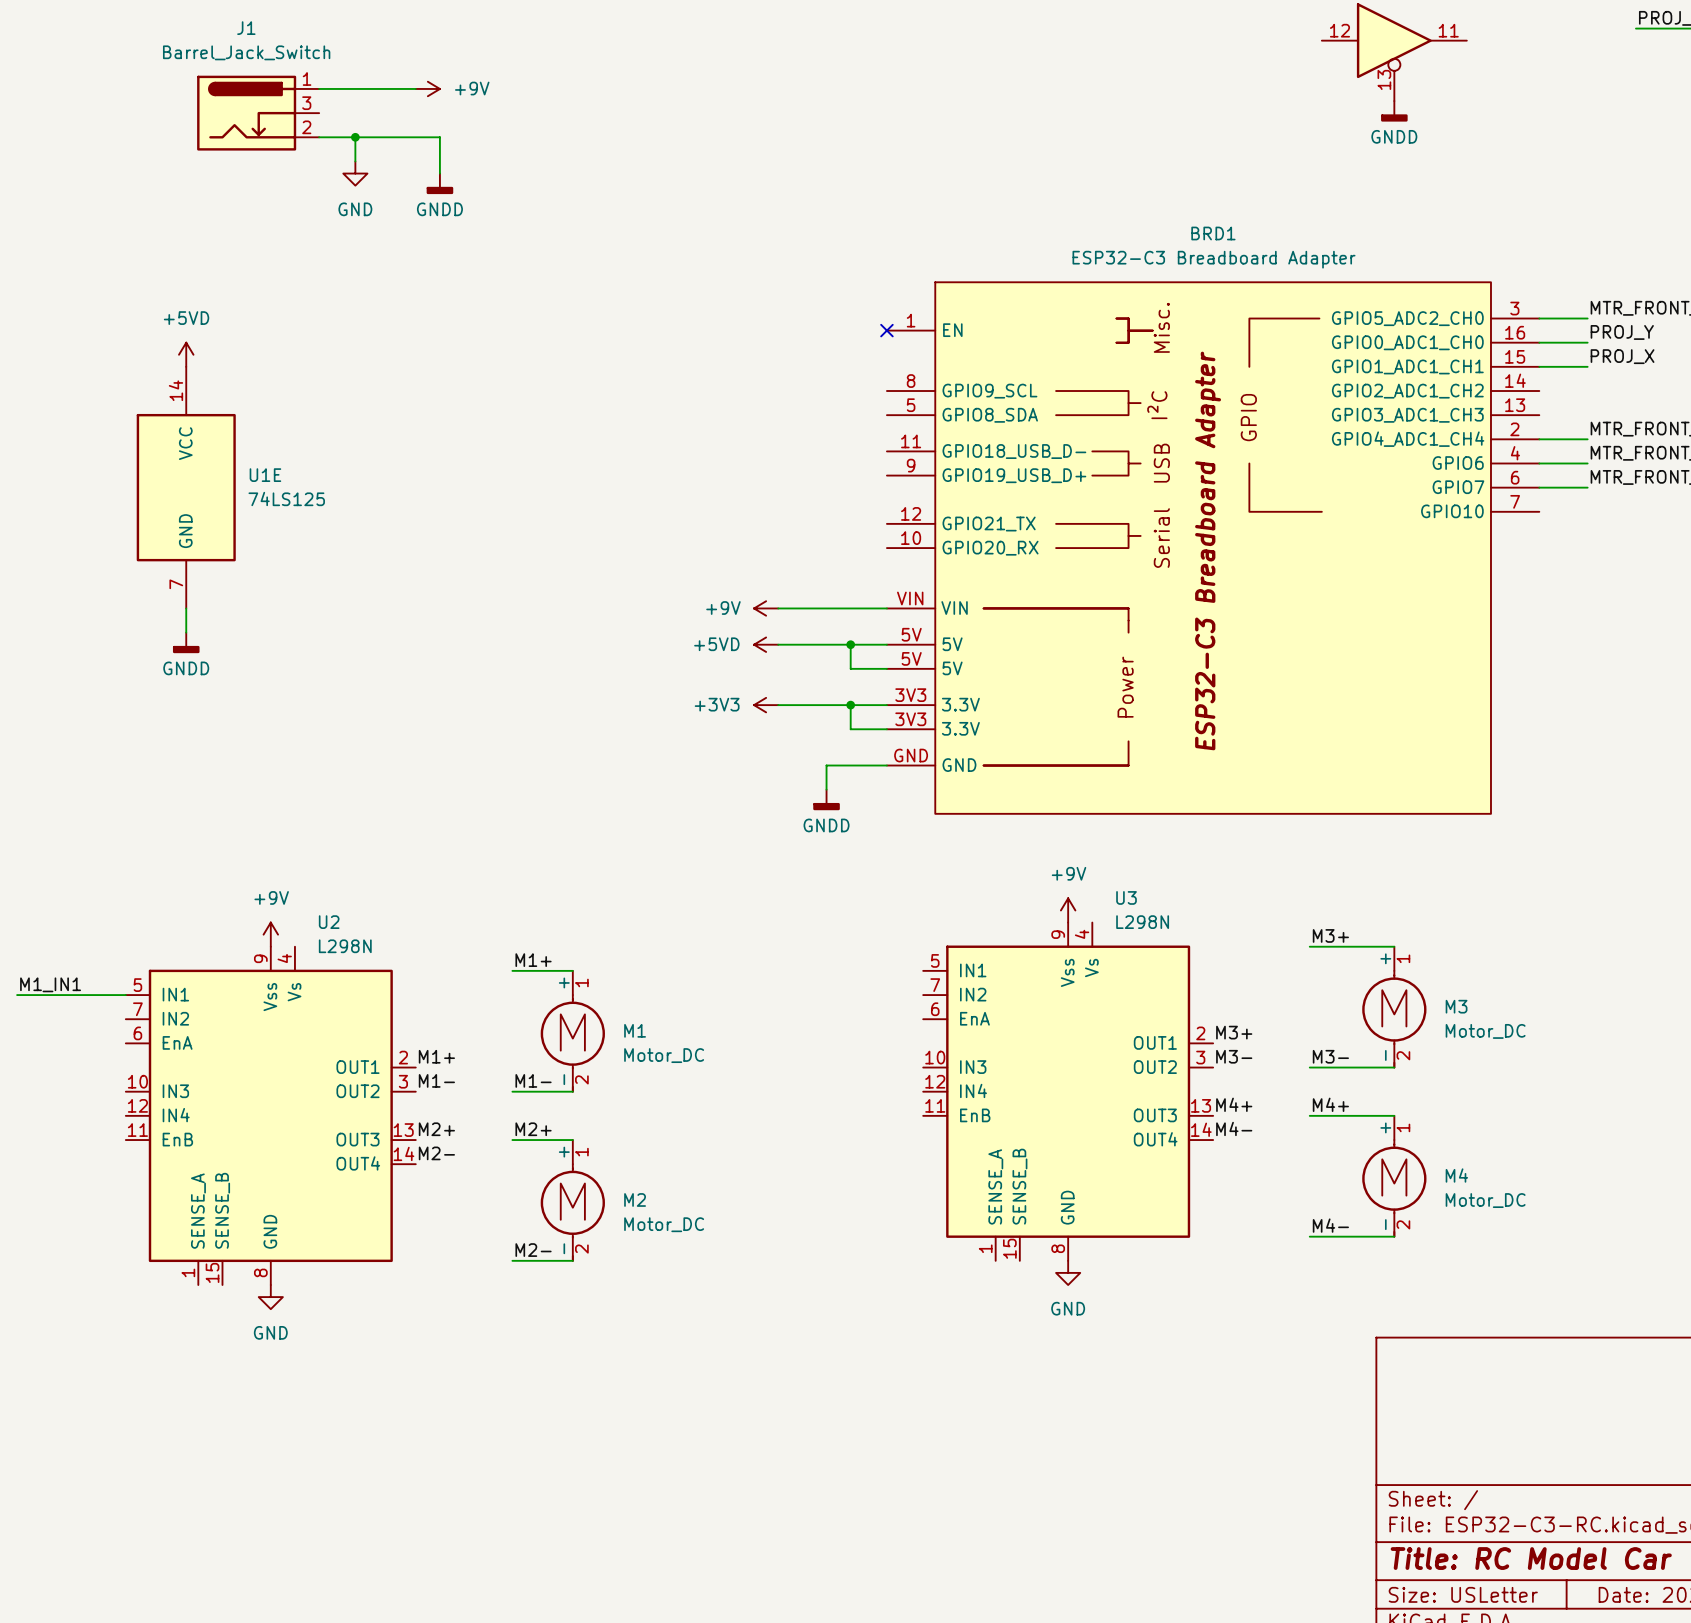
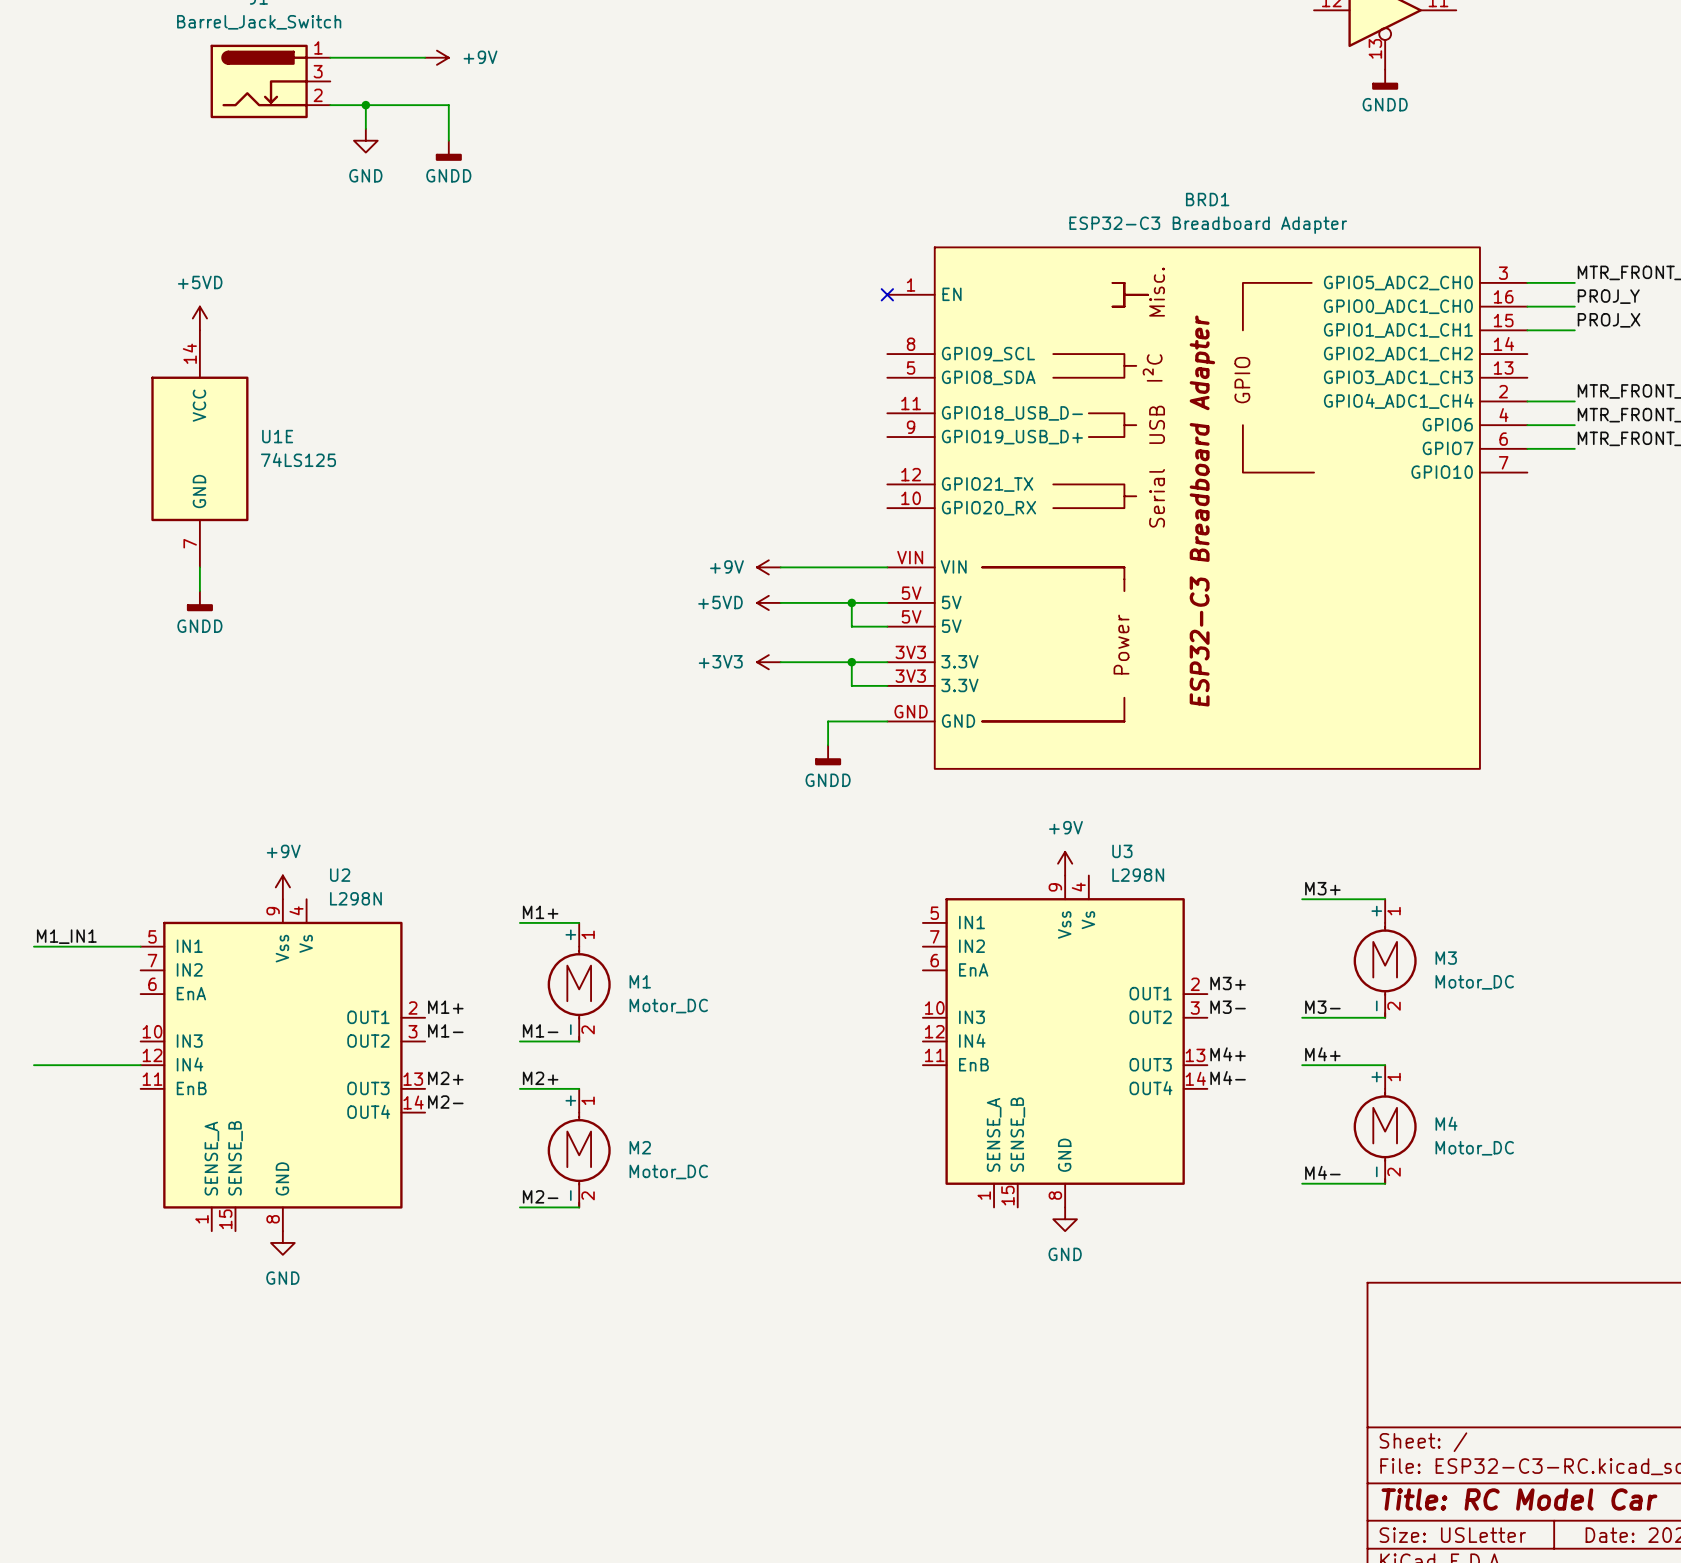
wire: none -> (33, 1065) (140, 1065)

